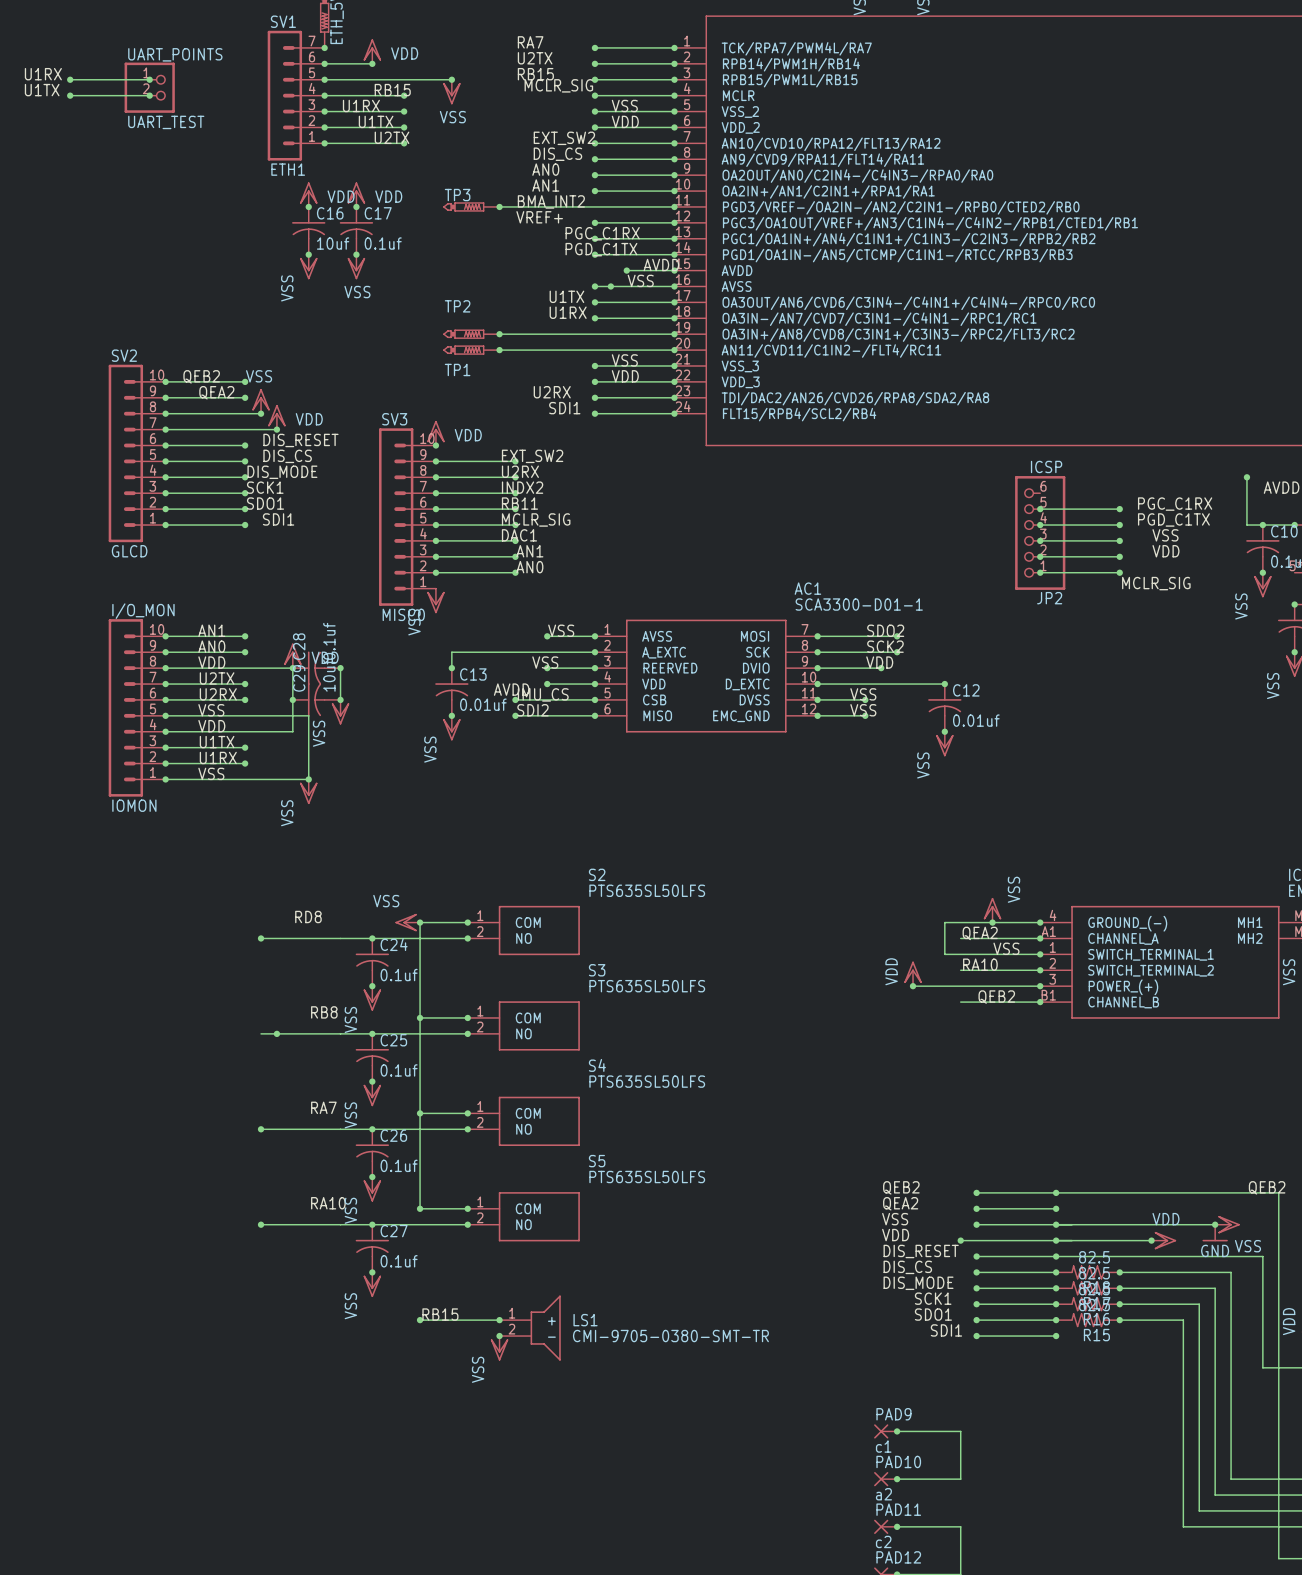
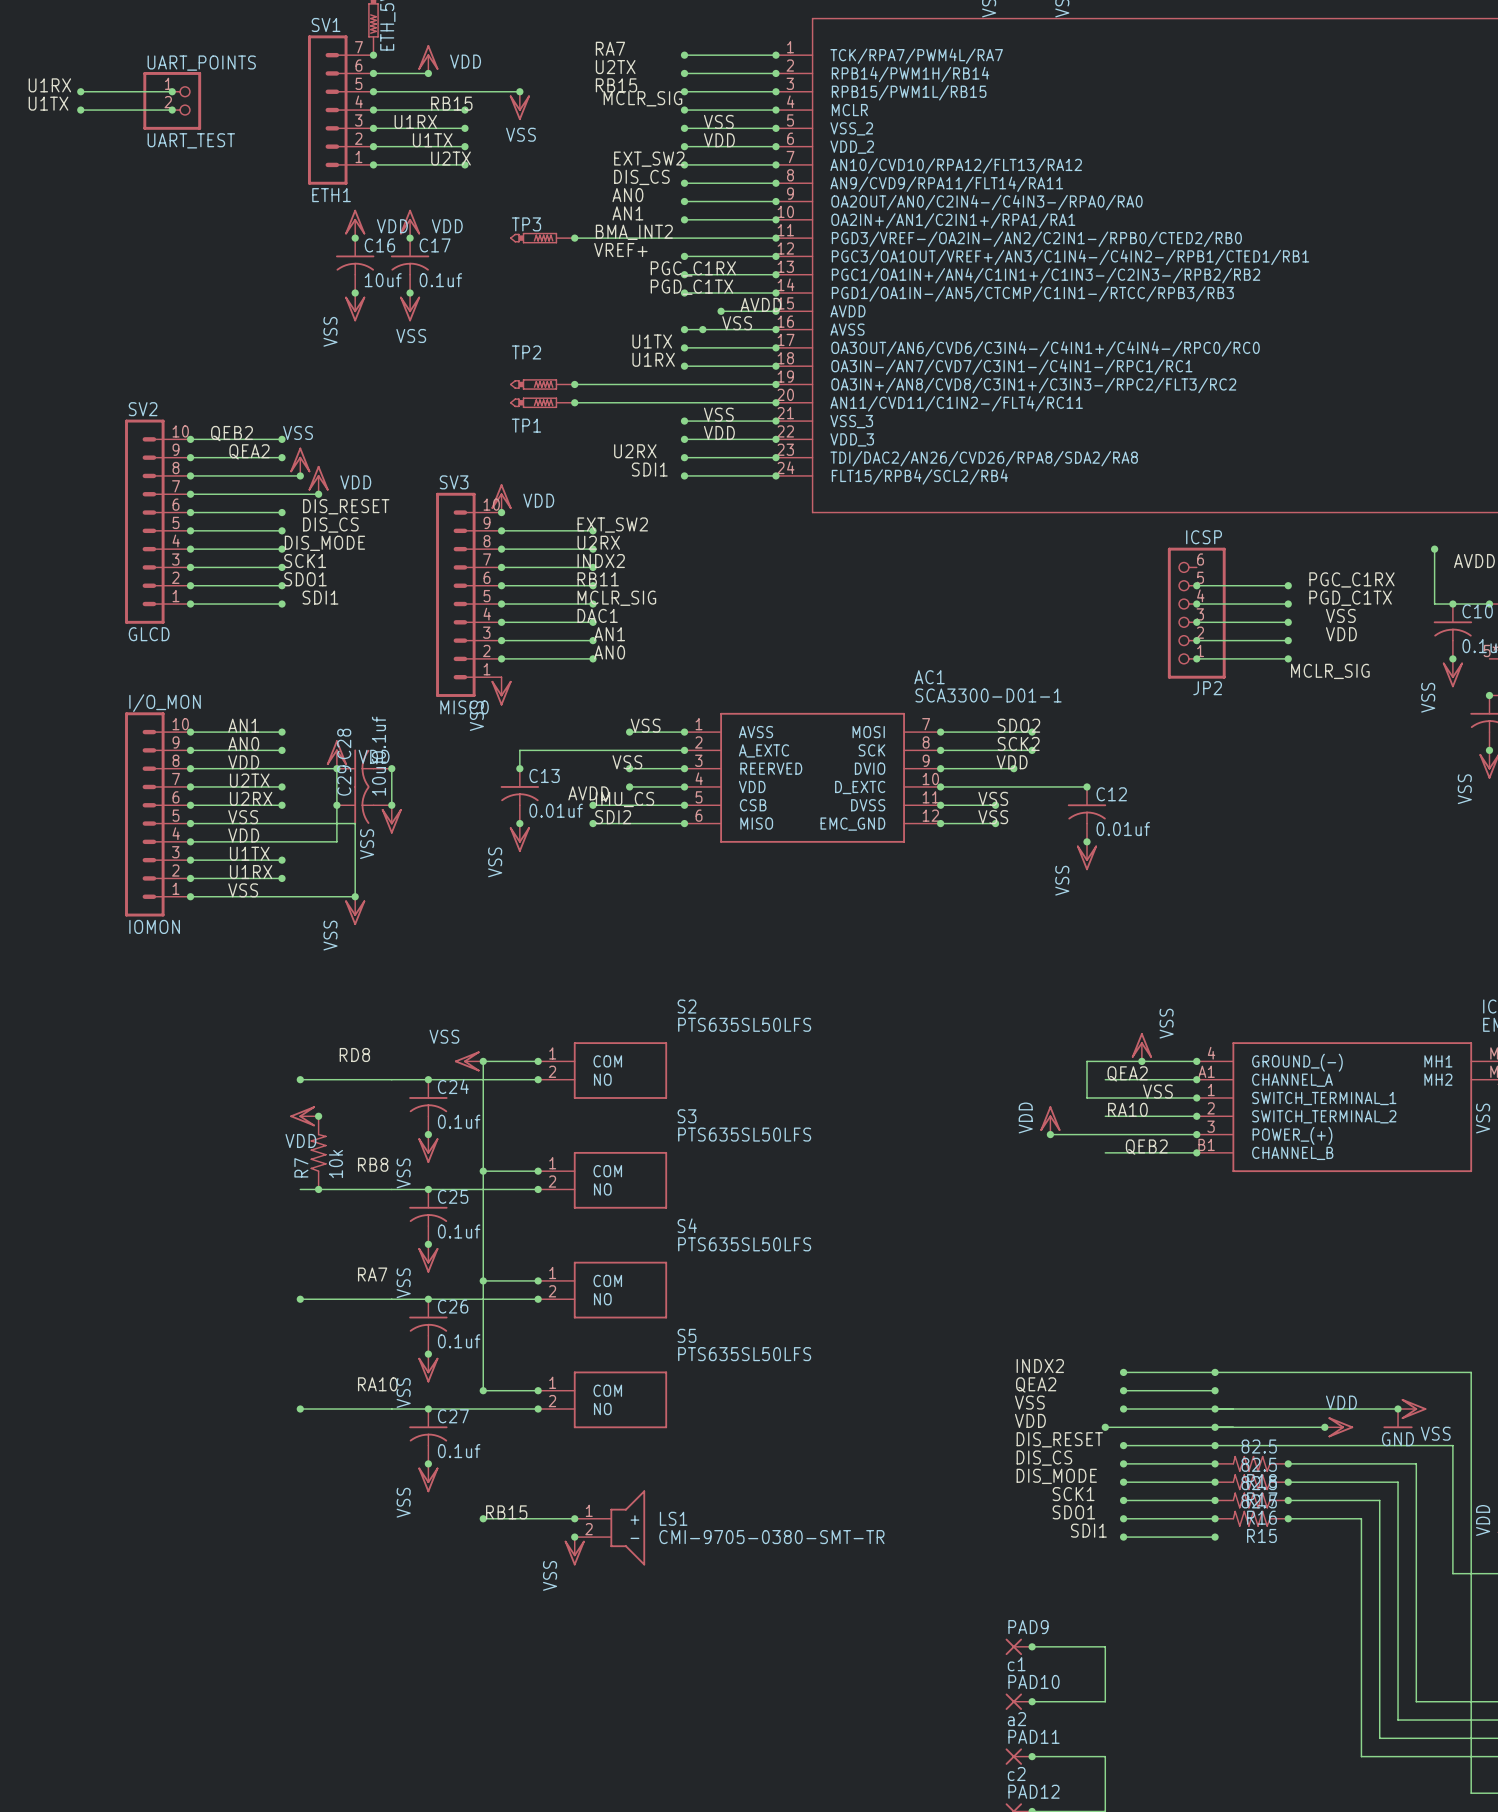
power symbol: none -> VDD (304, 1116)
junction: none -> (318, 1116)
R7: none -> 10k (318, 1152)
label: QEB2 (901, 1187) -> INDX2 (1040, 1366)
label: QEB2 (1267, 1187) -> none

